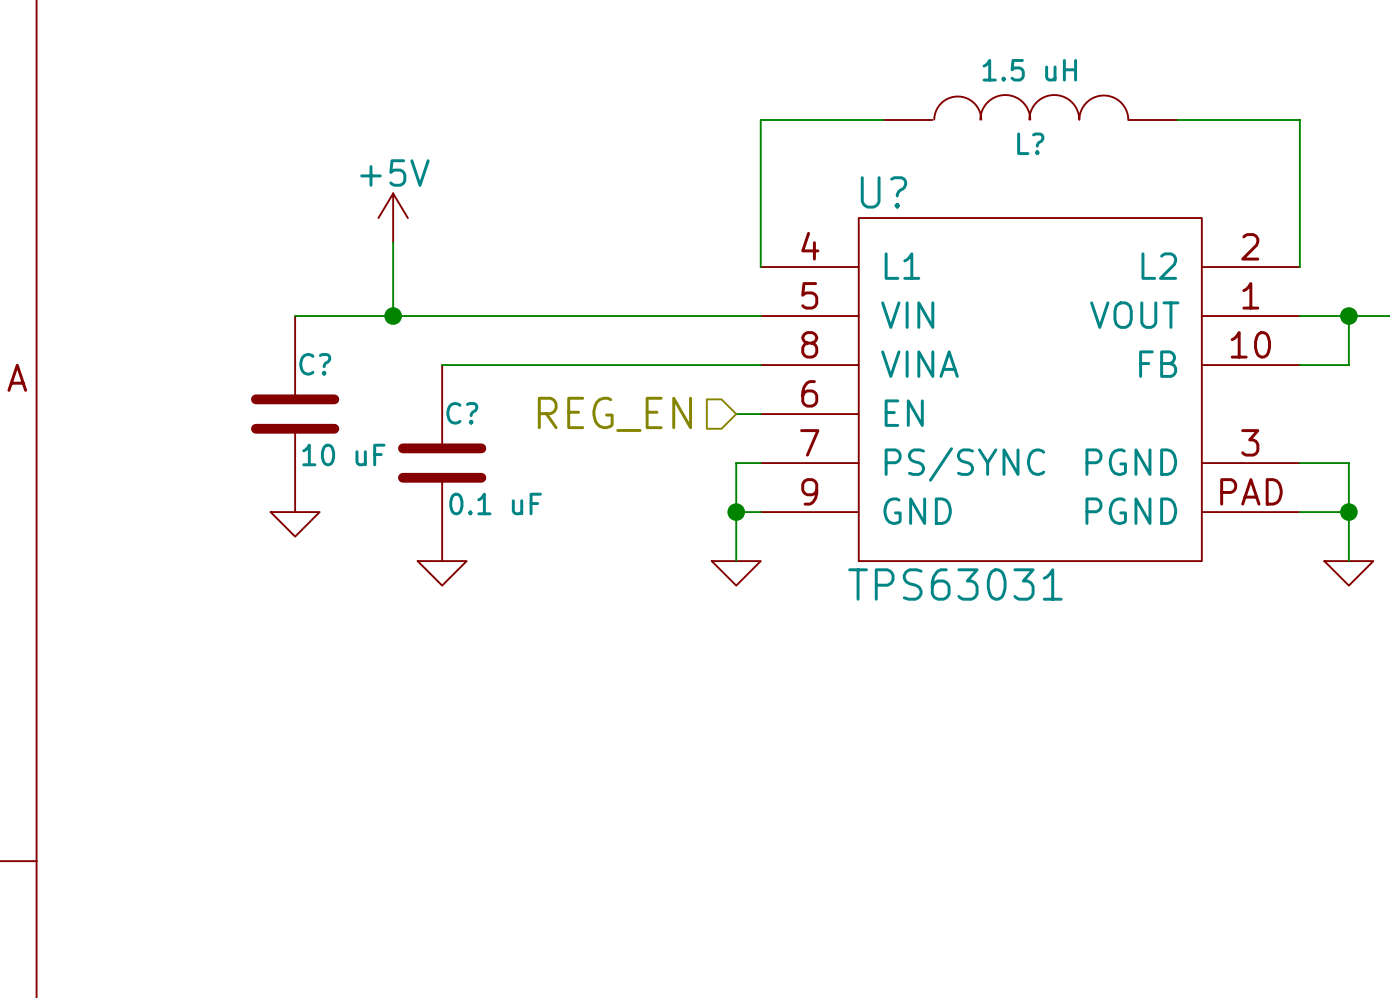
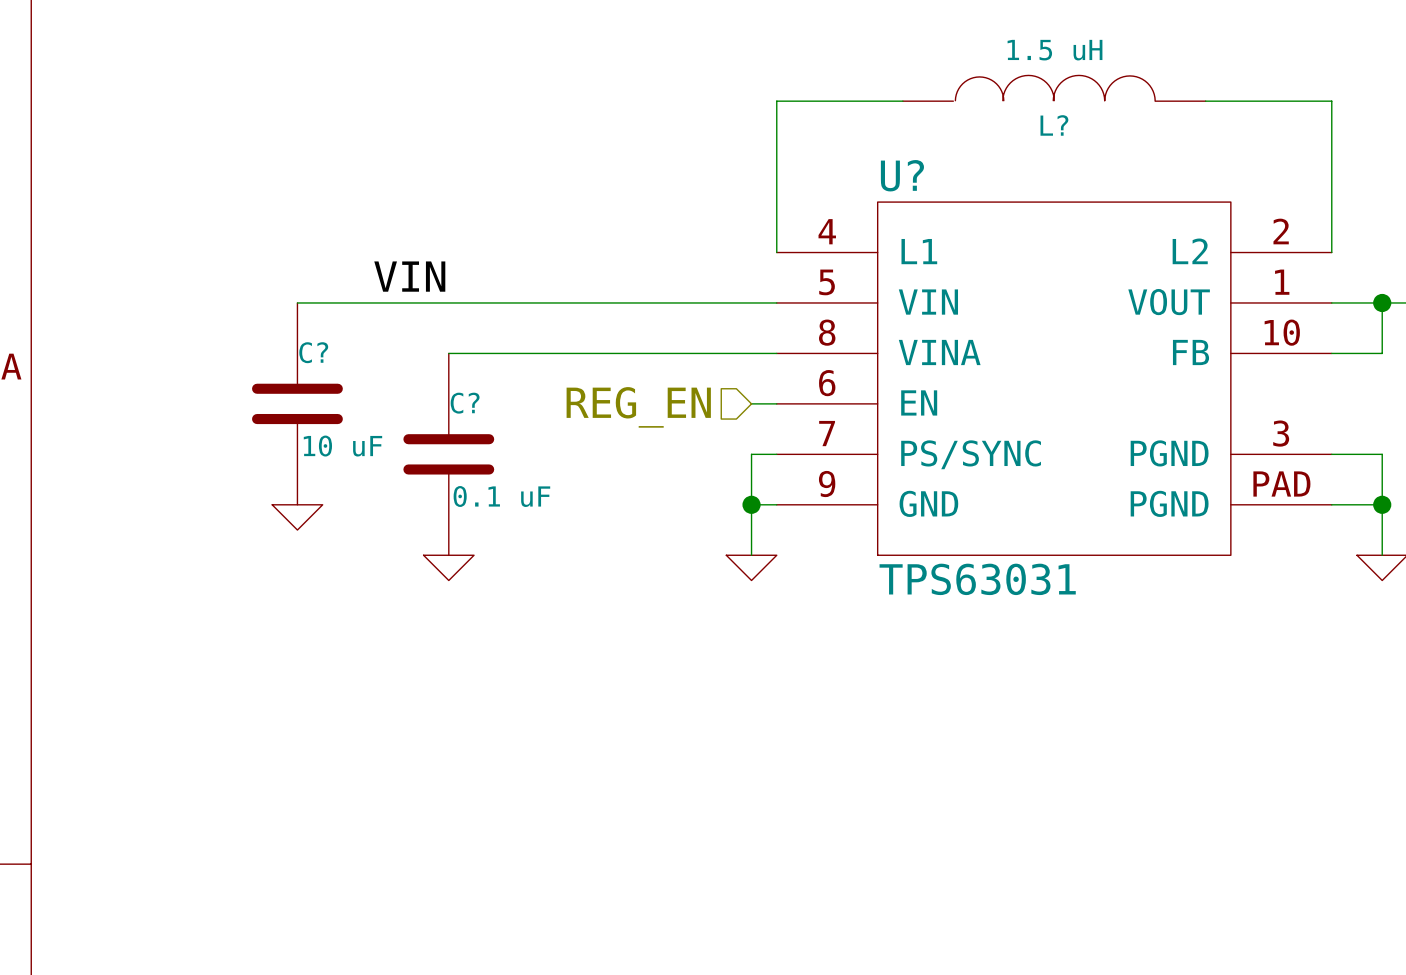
power symbol: +5V (393, 218) -> none
wire: (393, 242) (393, 316) -> none
label: none -> VIN (409, 276)
junction: (393, 316) -> none

